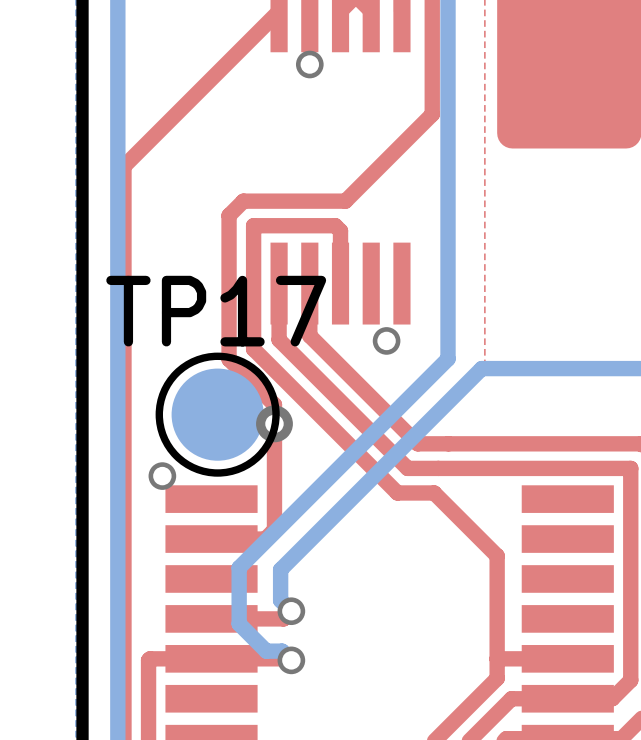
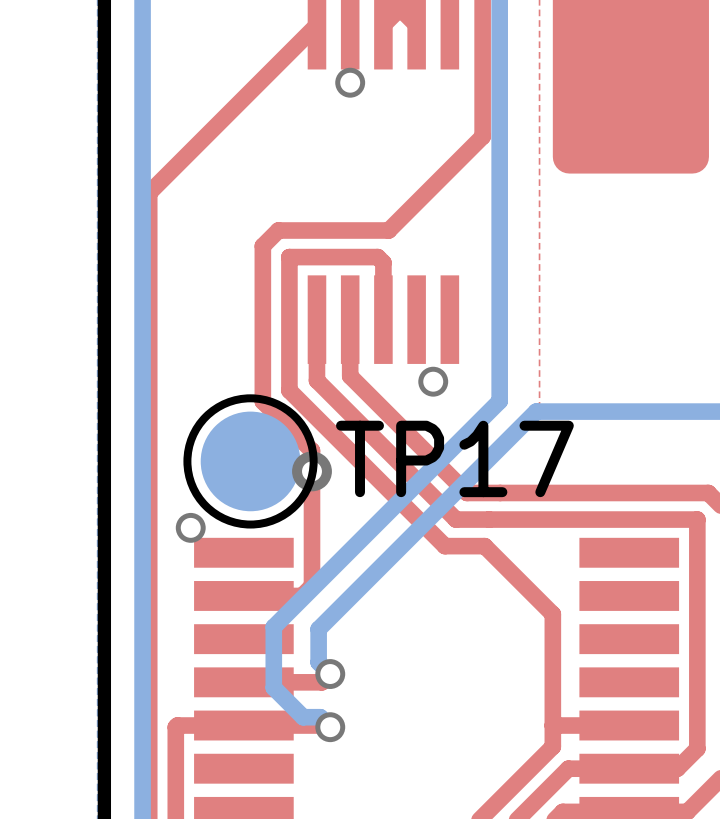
TP17 name position: TP17 (216, 311) -> TP17 (454, 458)

